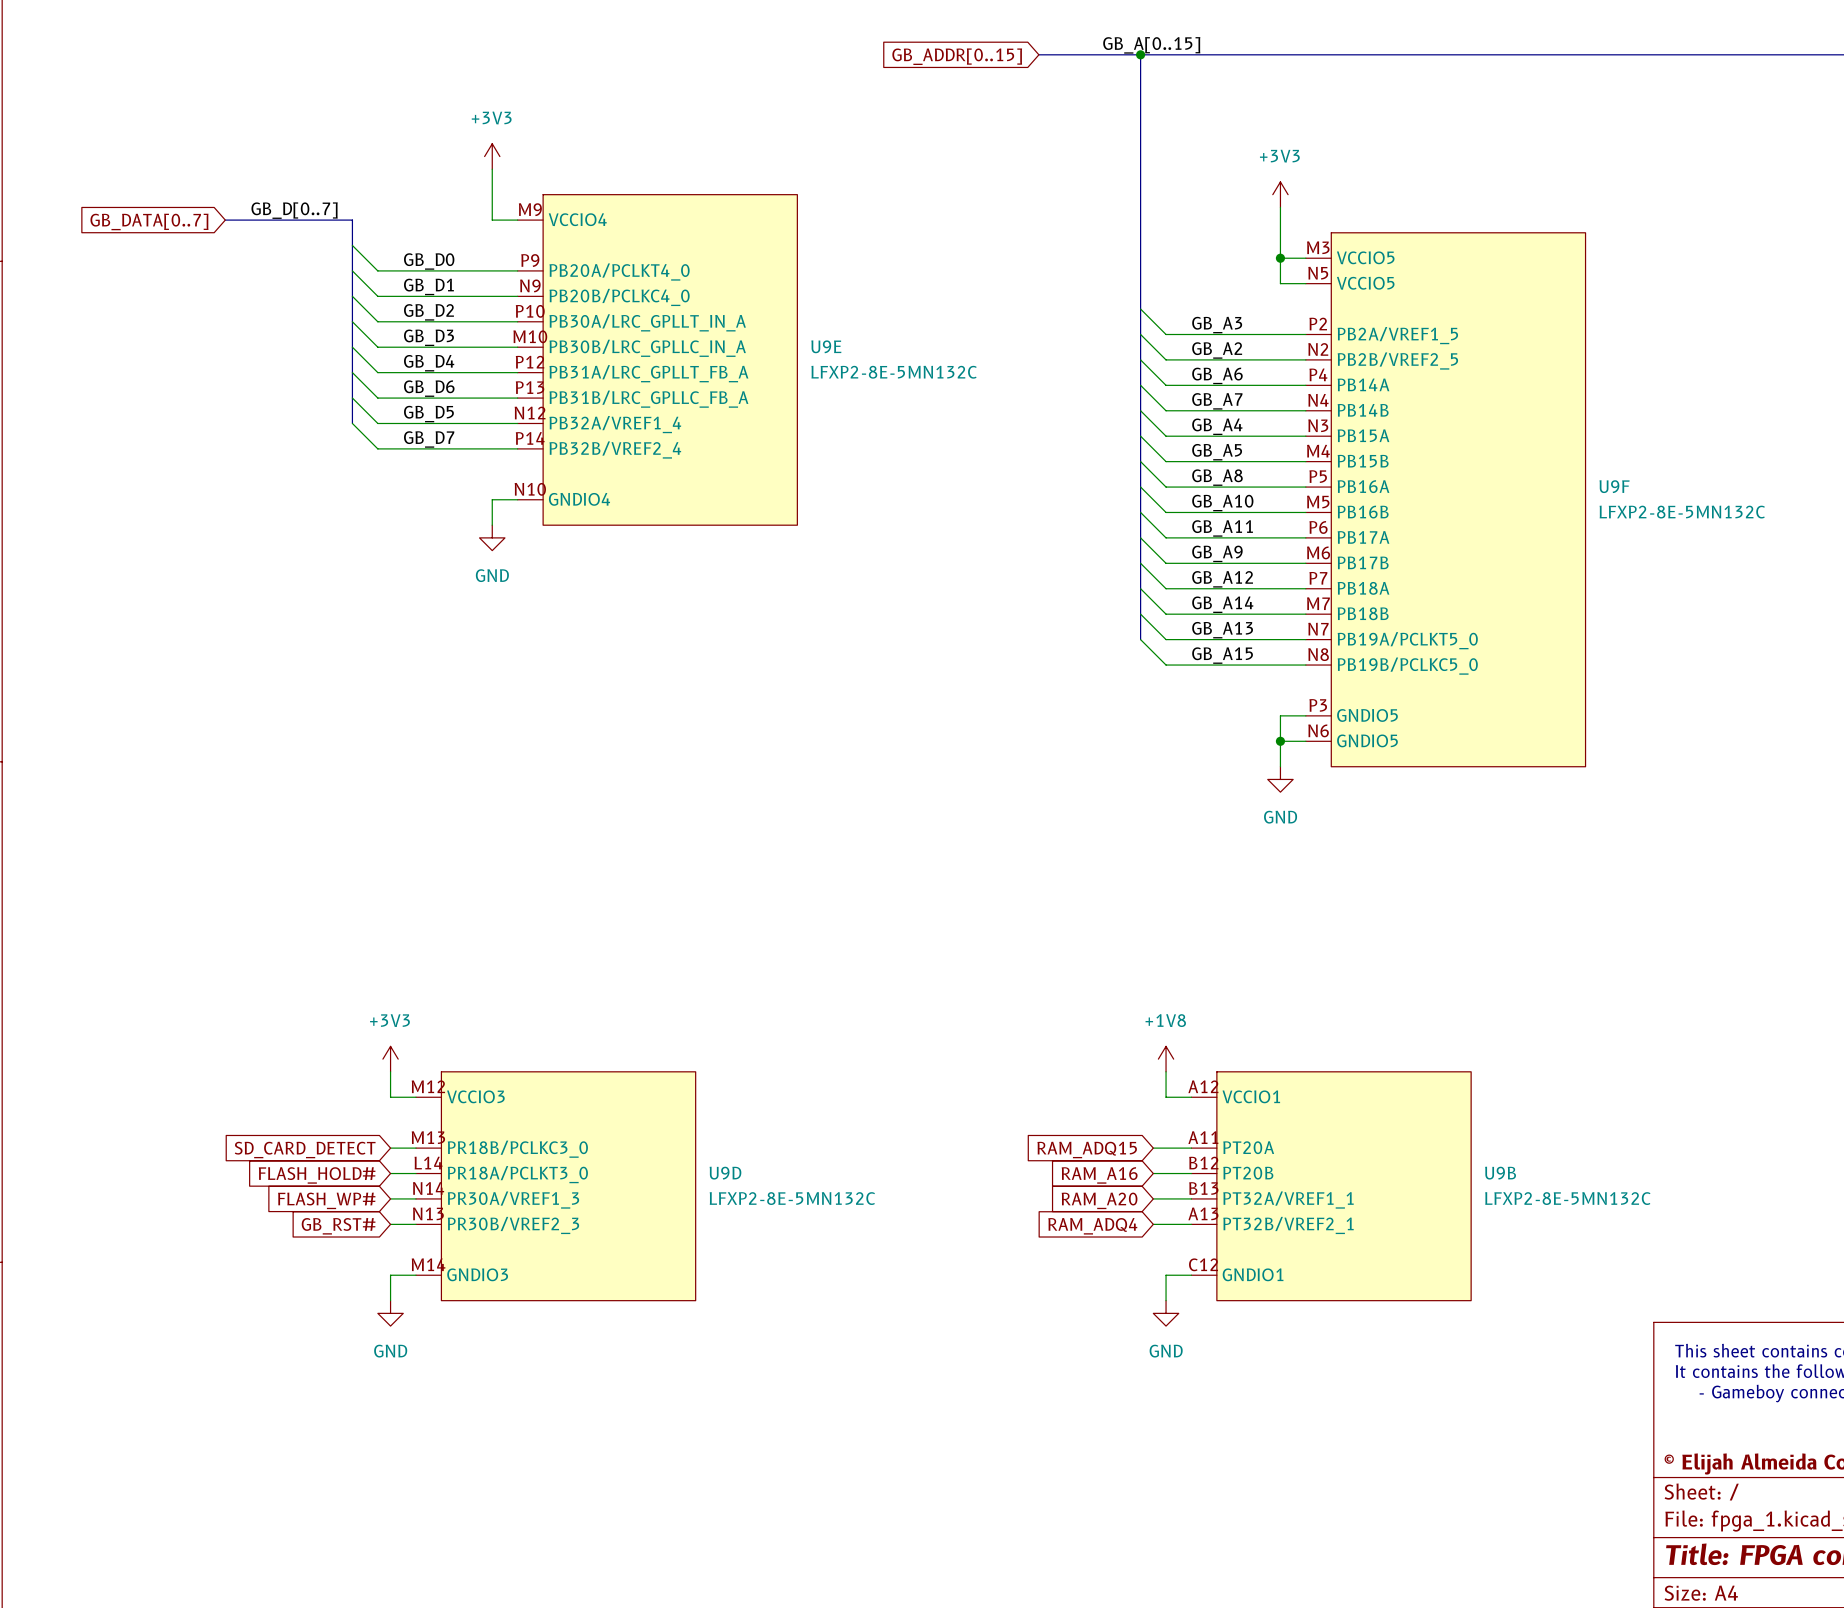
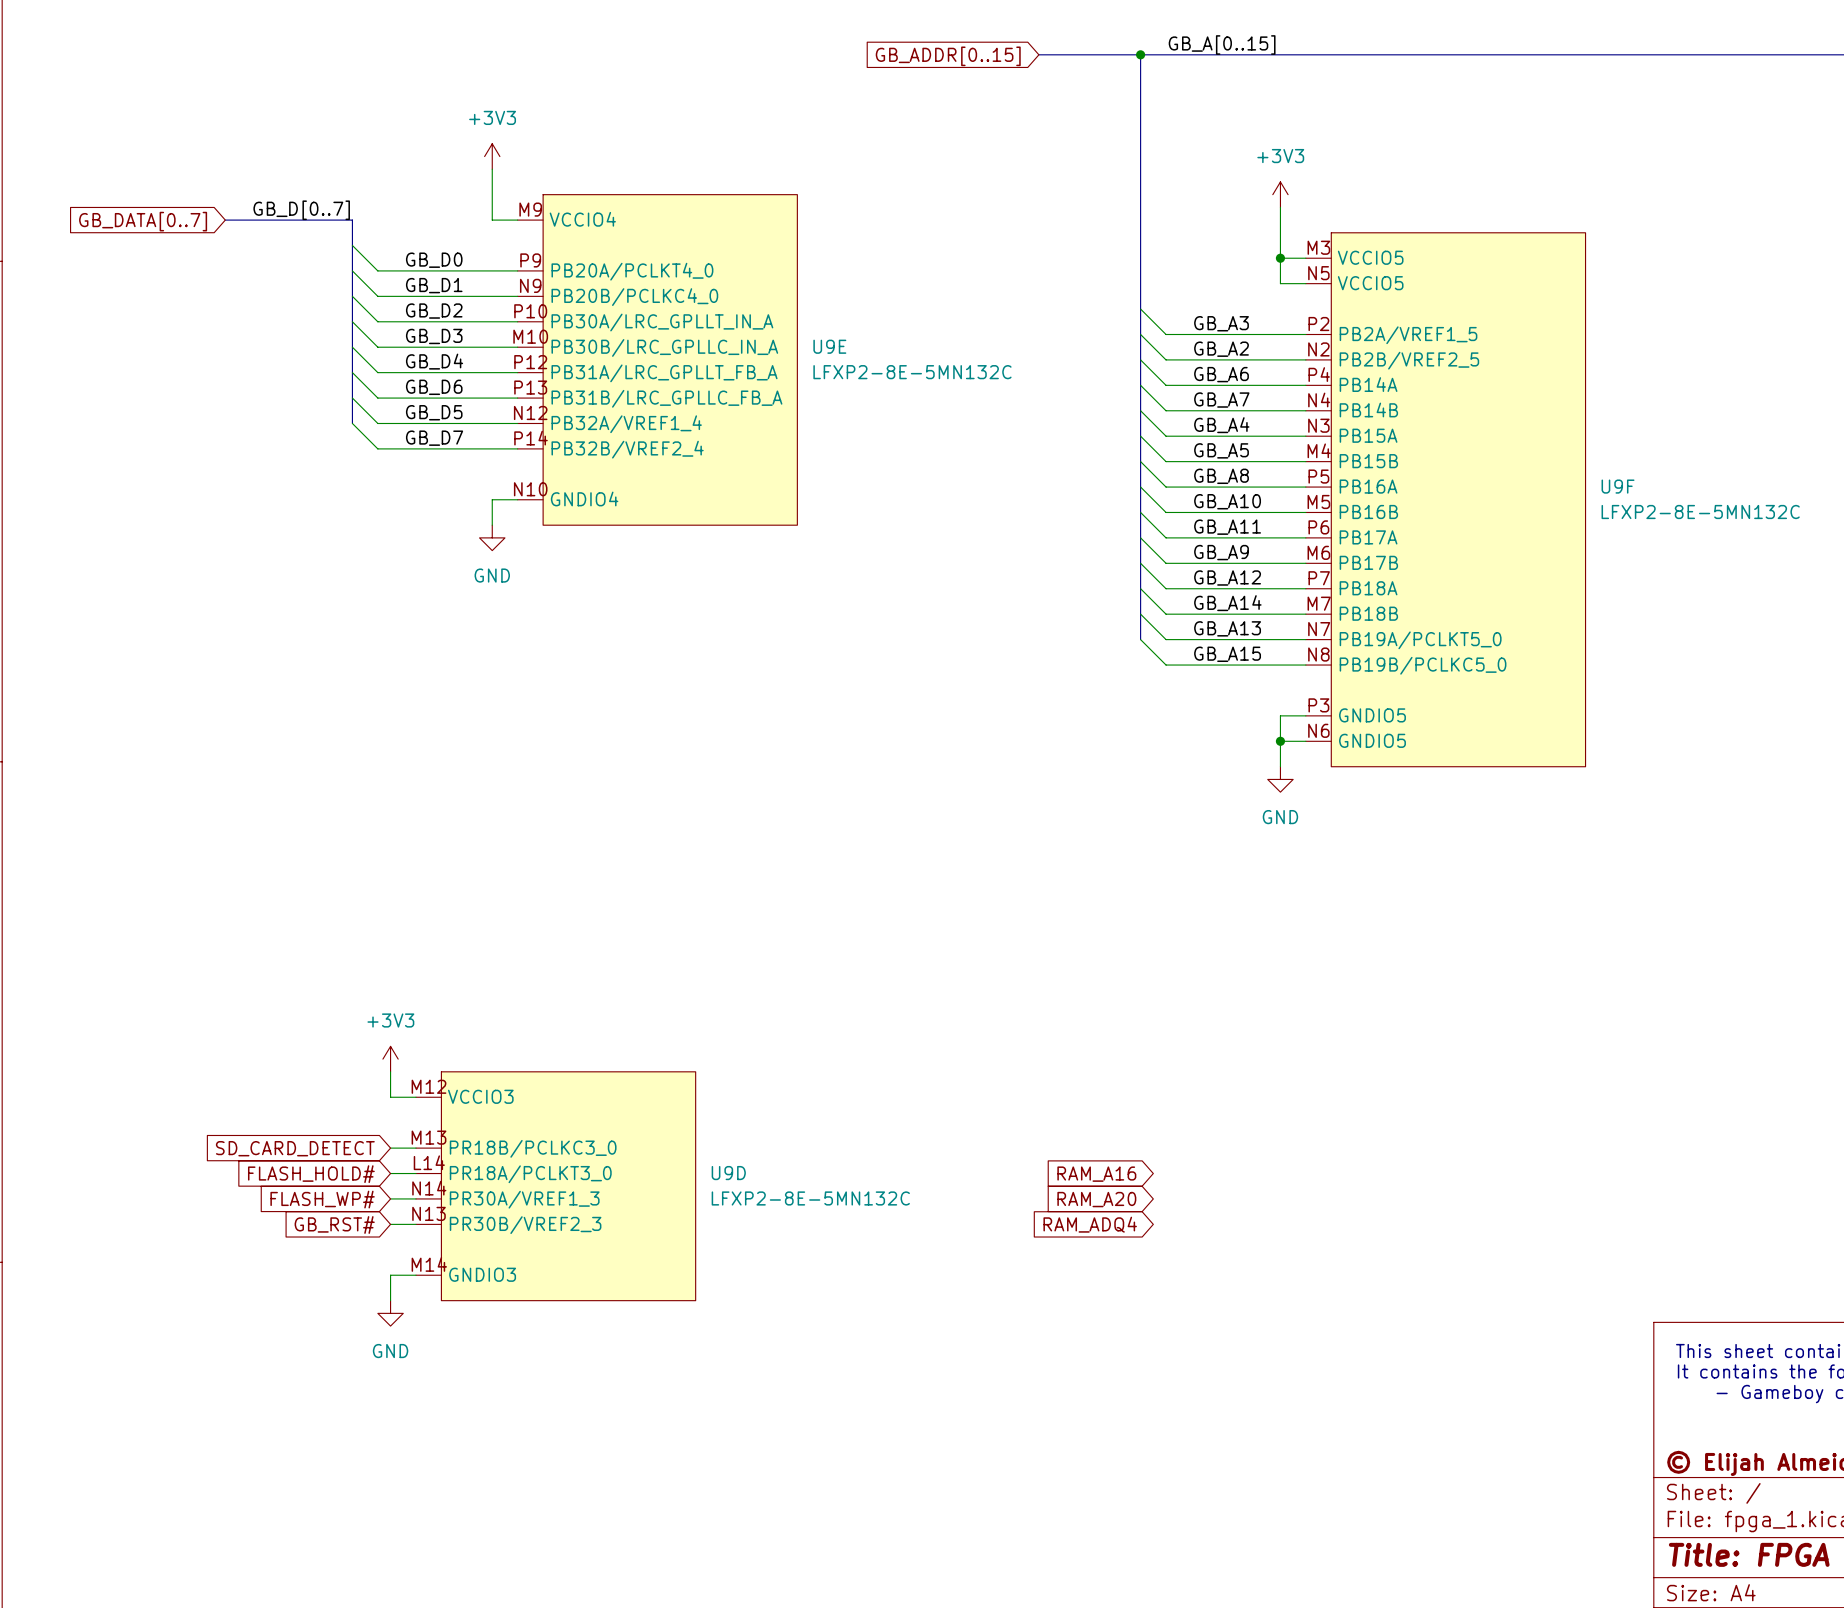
label position: GB_A[0..15] (1151, 45) -> GB_A[0..15] (1222, 44)
power symbol: +1V8 (1166, 1059) -> none
wire: (1166, 1071) (1166, 1097) (1191, 1097) -> none
wire: (1153, 1148) (1191, 1148) -> none
global label: RAM_ADQ15 (1087, 1150) -> none
wire: (1153, 1173) (1191, 1173) -> none
U9B: LFXP2-8E-5MN132C (1331, 1186) -> none
wire: (1153, 1198) (1191, 1198) -> none
wire: (1153, 1224) (1191, 1224) -> none
wire: (1191, 1275) (1166, 1275) (1166, 1300) -> none
power symbol: GND (1166, 1313) -> none

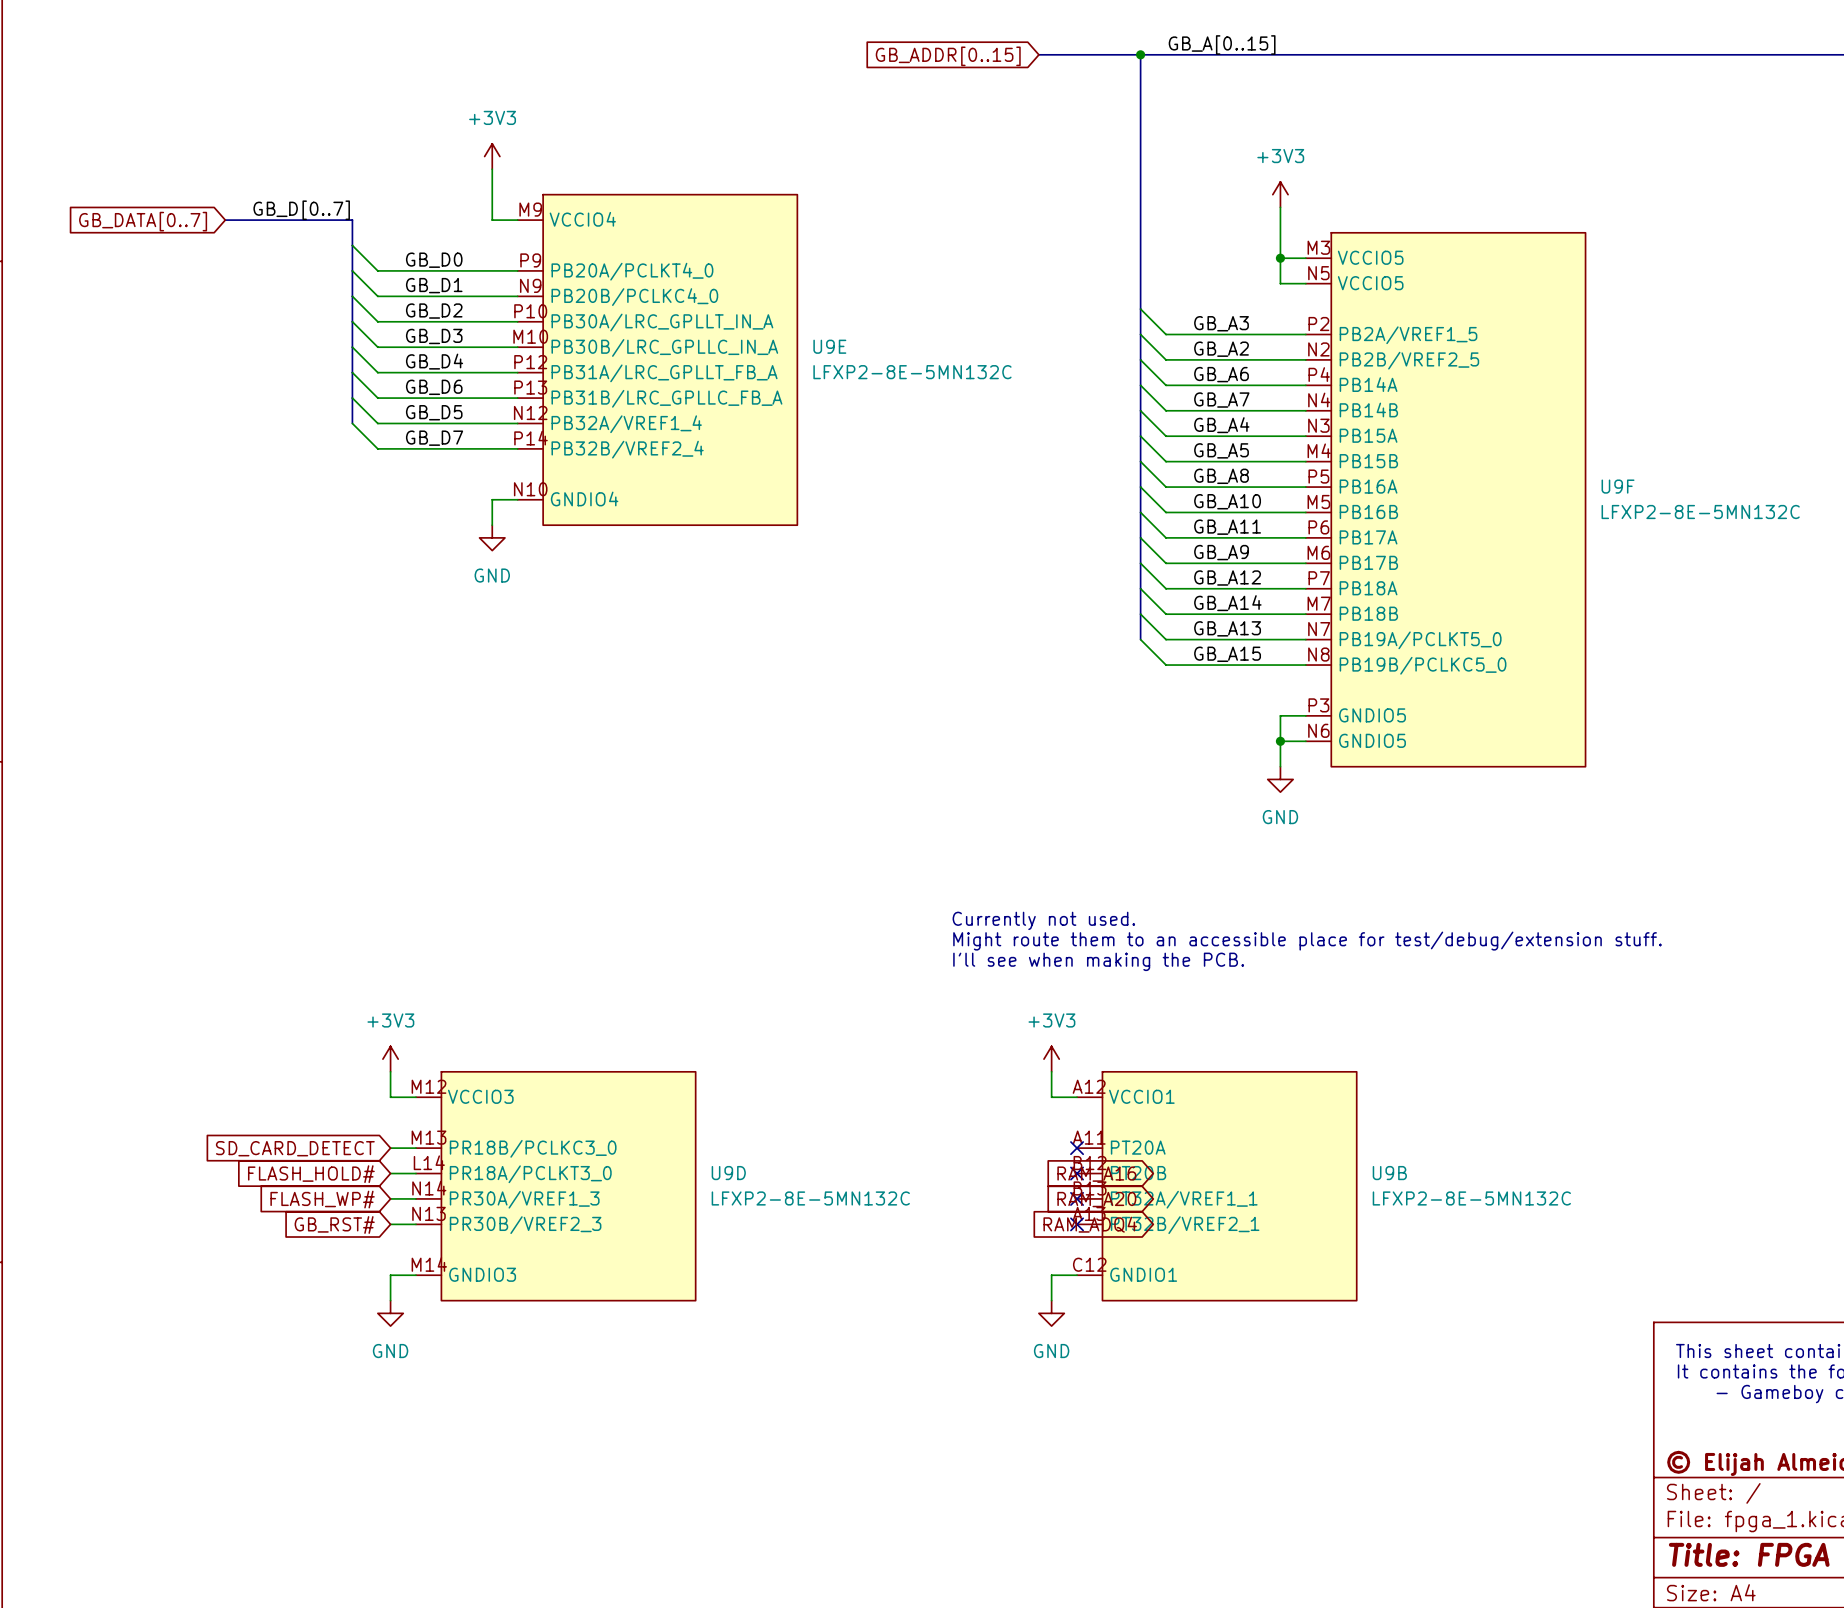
text: none -> Currently not used. (1043, 920)
text: none -> Might route them to an accessible place for test/debug/extension stuff. (1307, 941)
text: none -> I'll see when making the PCB. (1098, 961)
power symbol: none -> +3V3 (1051, 1059)
wire: none -> (1051, 1071) (1051, 1097) (1077, 1097)
no-connect mark: none -> (1077, 1148)
no-connect mark: none -> (1077, 1173)
U9B: none -> LFXP2-8E-5MN132C (1216, 1186)
no-connect mark: none -> (1077, 1198)
no-connect mark: none -> (1077, 1224)
wire: none -> (1077, 1275) (1051, 1275) (1051, 1300)
power symbol: none -> GND (1051, 1313)

